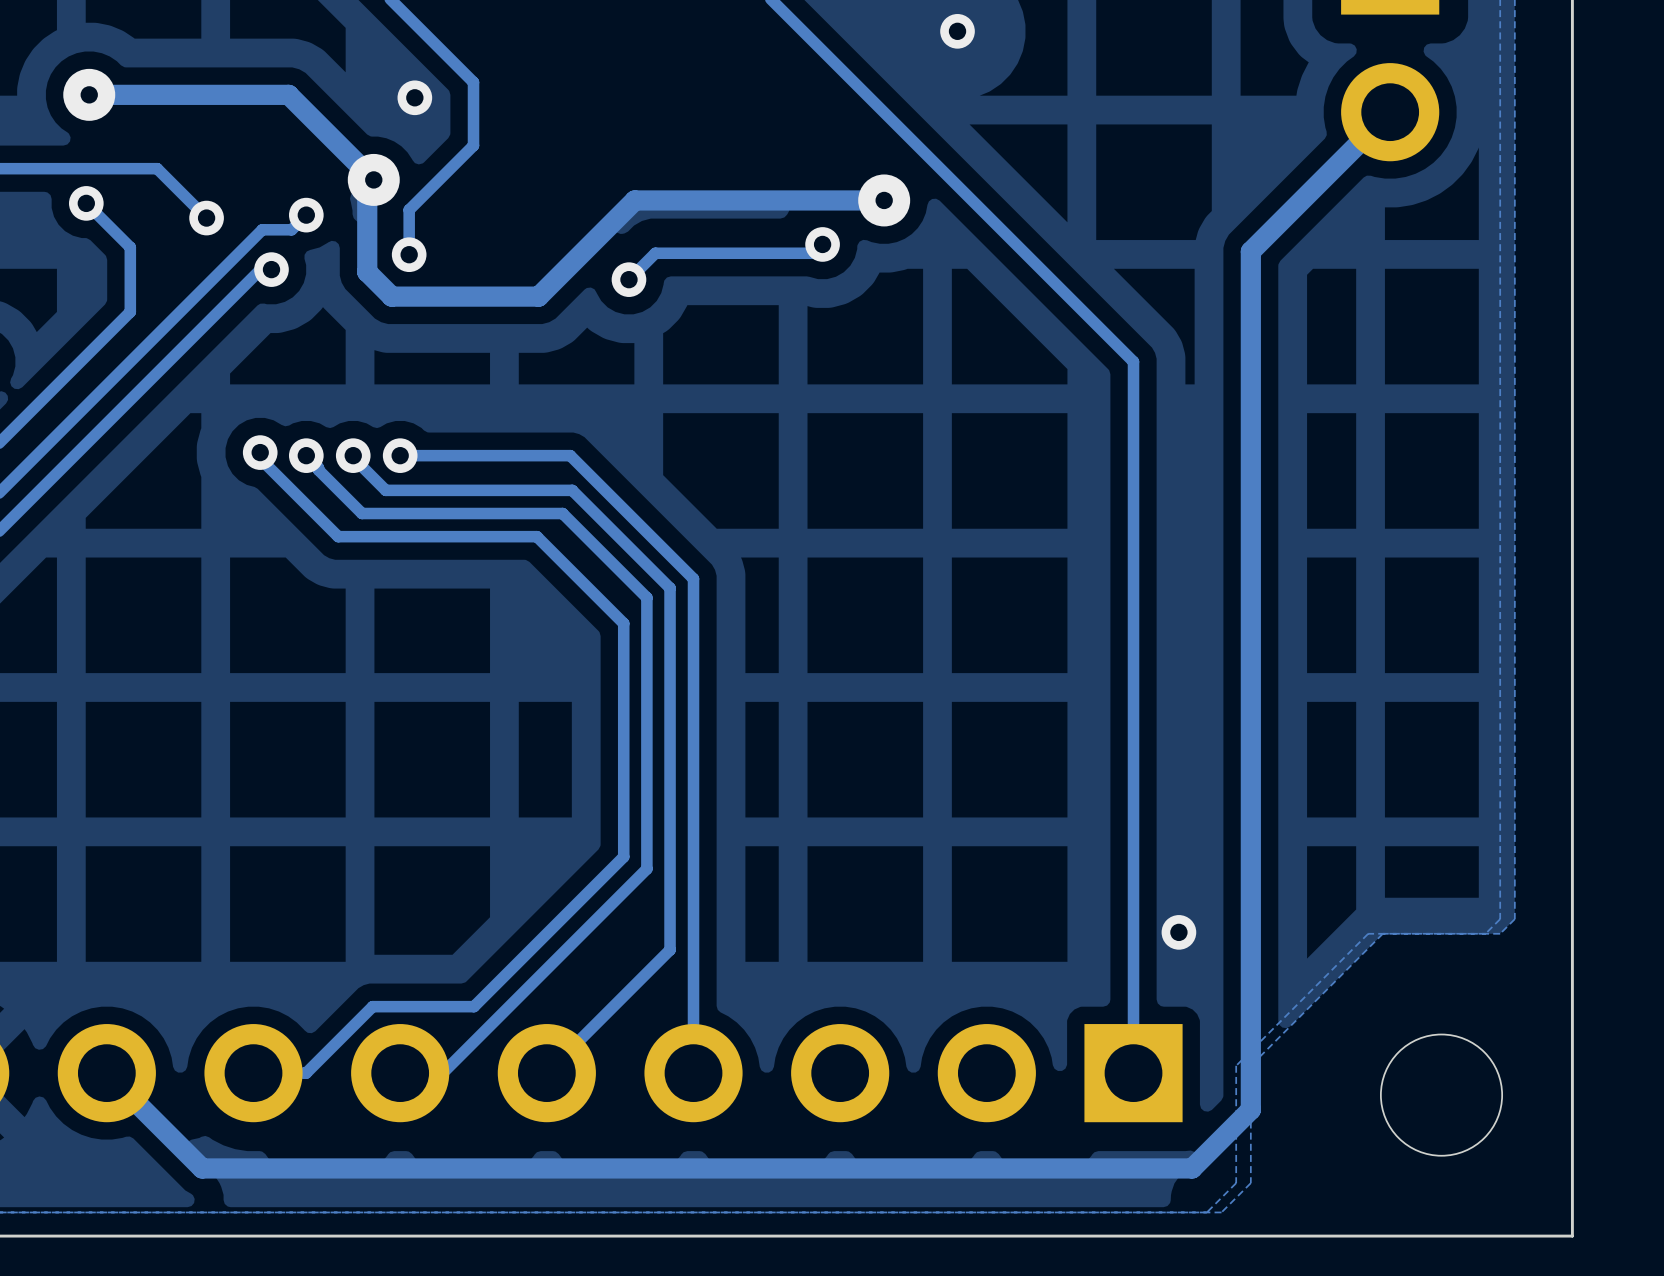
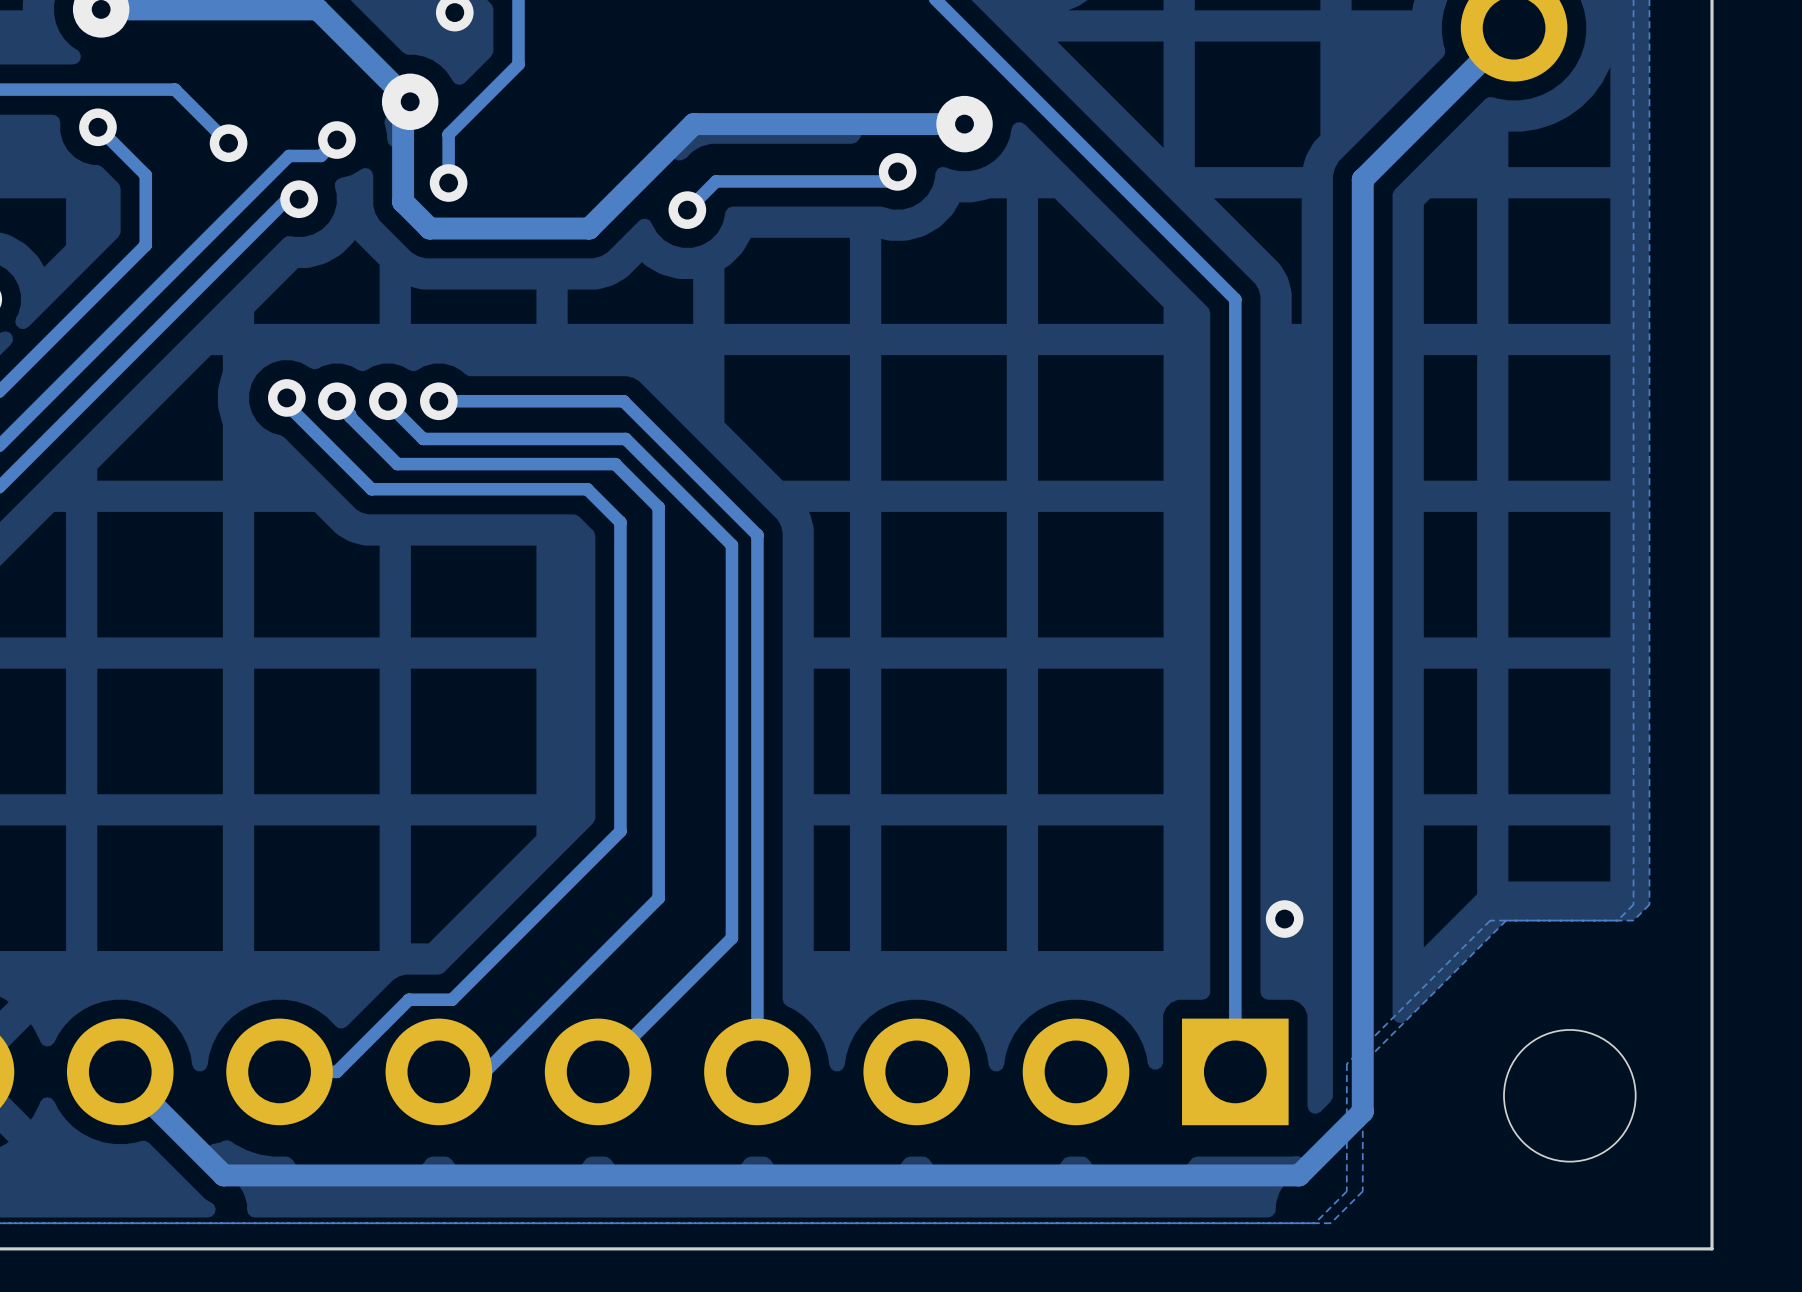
track: (602, 553) (646, 597) (646, 868) (602, 913) -> (658, 507) (658, 898)
track: (567, 567) (623, 623) (623, 856) (473, 1006) (412, 1006) -> (620, 522) (620, 831) (452, 999)

